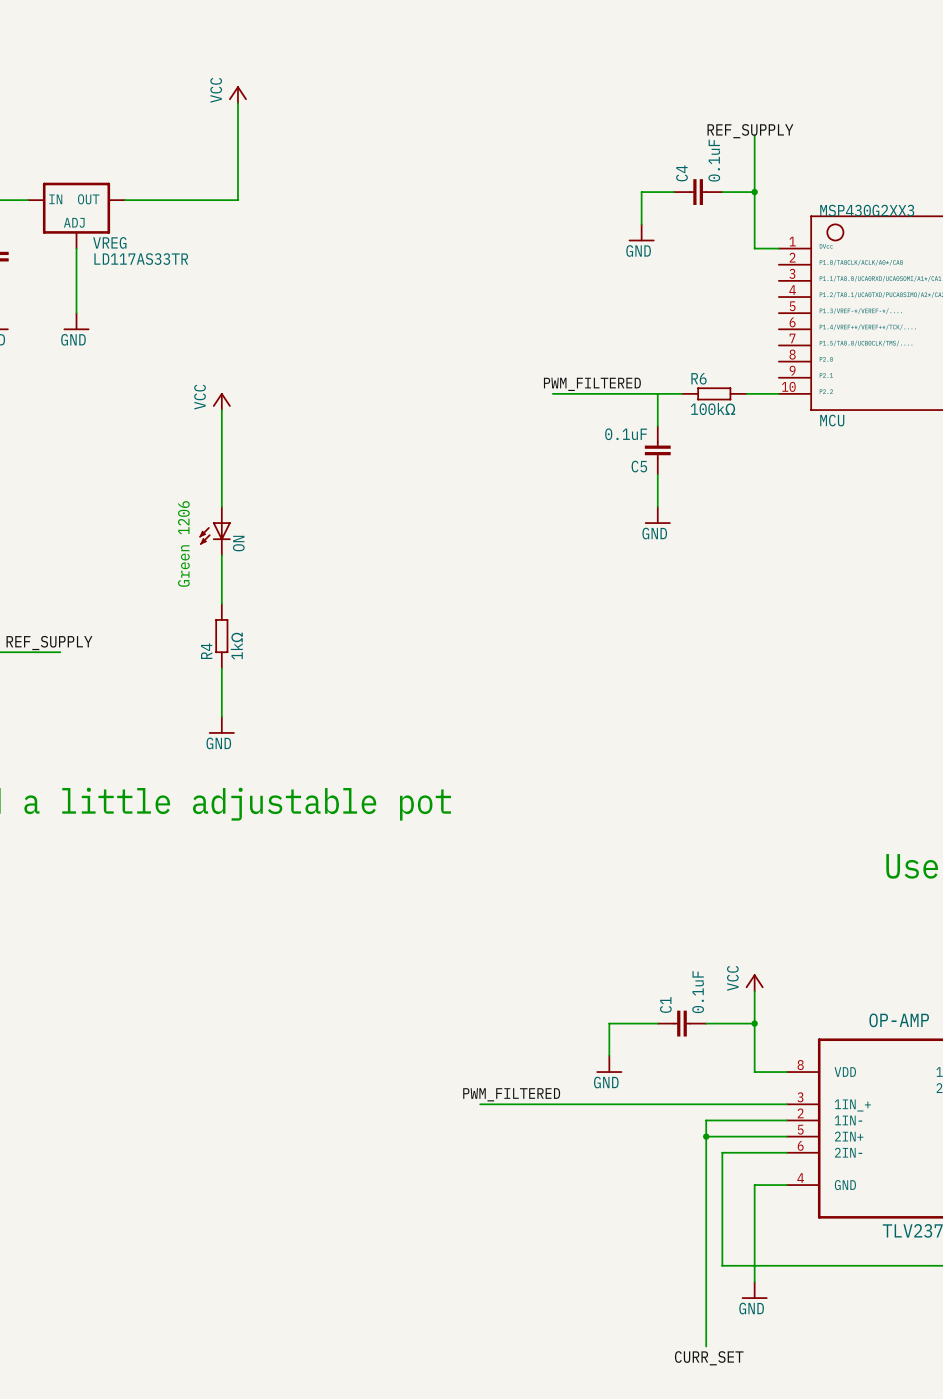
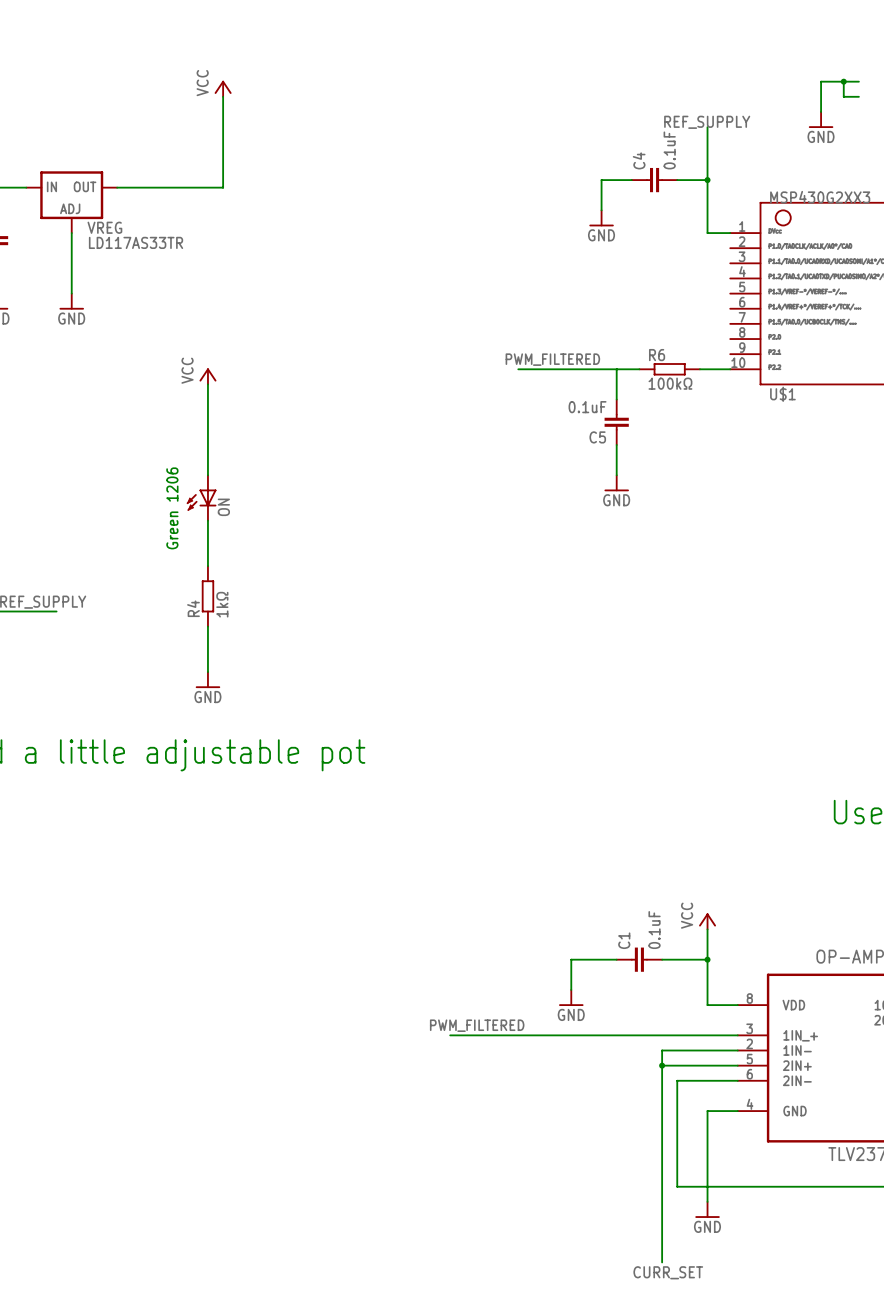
wire: none -> (843, 81) (843, 96) (858, 96)
junction: none -> (843, 81)
wire: none -> (858, 81) (821, 81) (821, 111)
power symbol: none -> GND (821, 119)
MCU name: MCU (832, 420) -> U$1 (782, 394)

